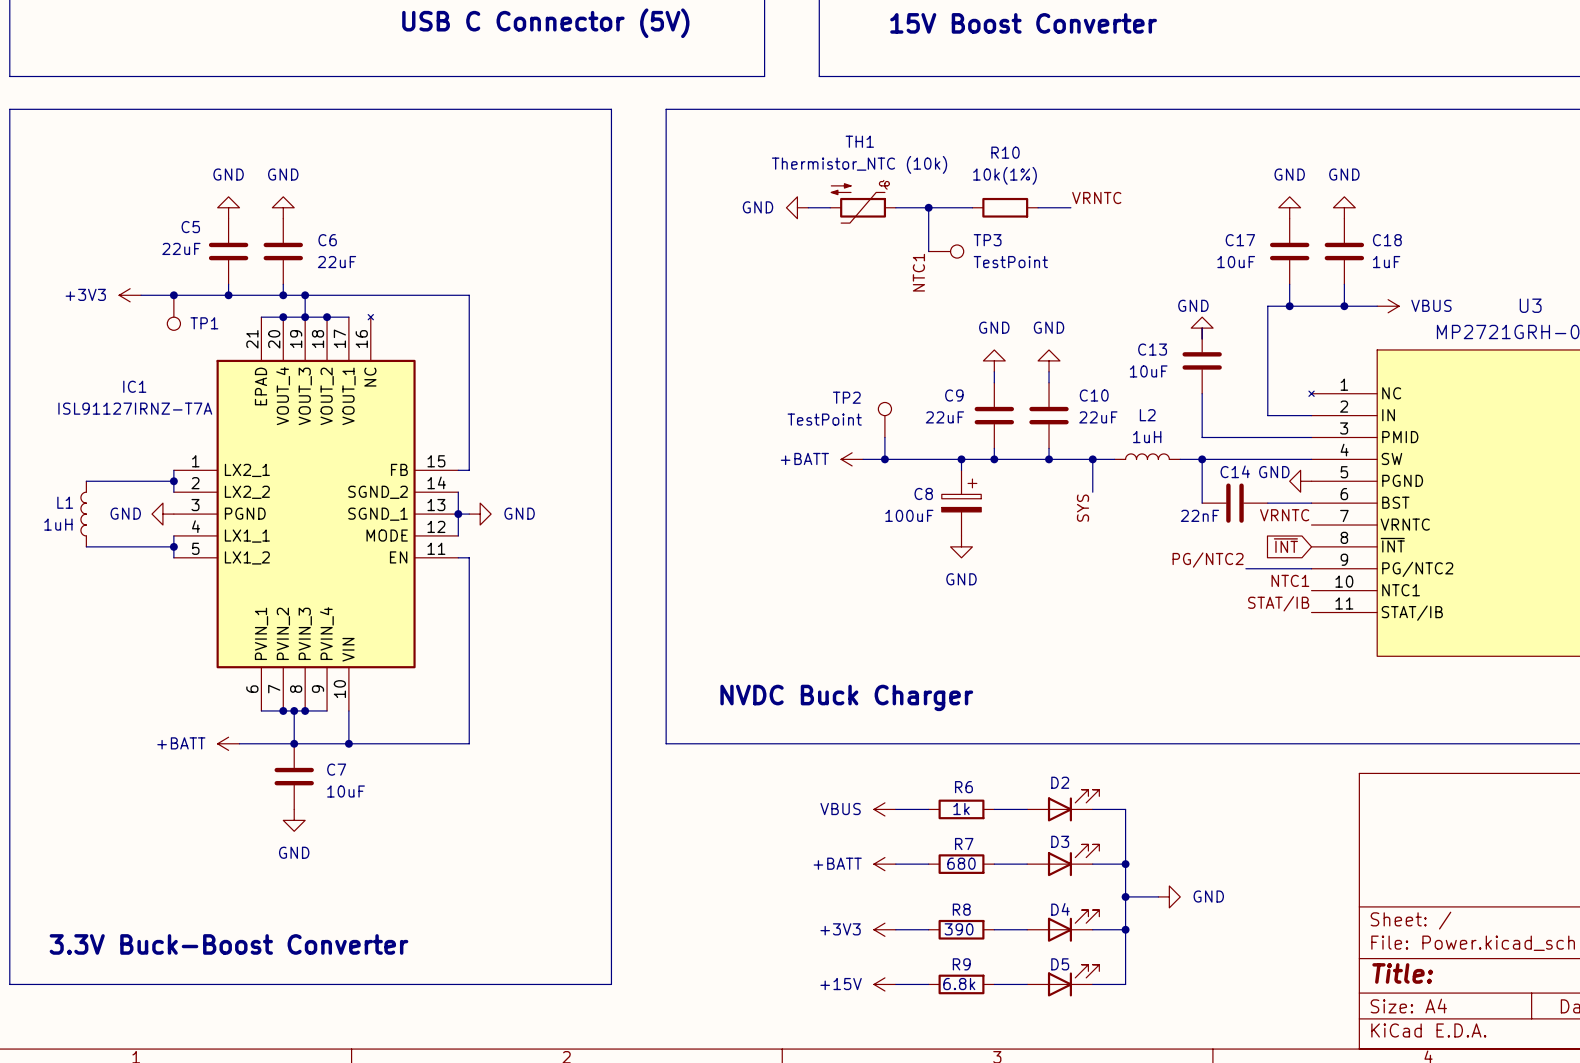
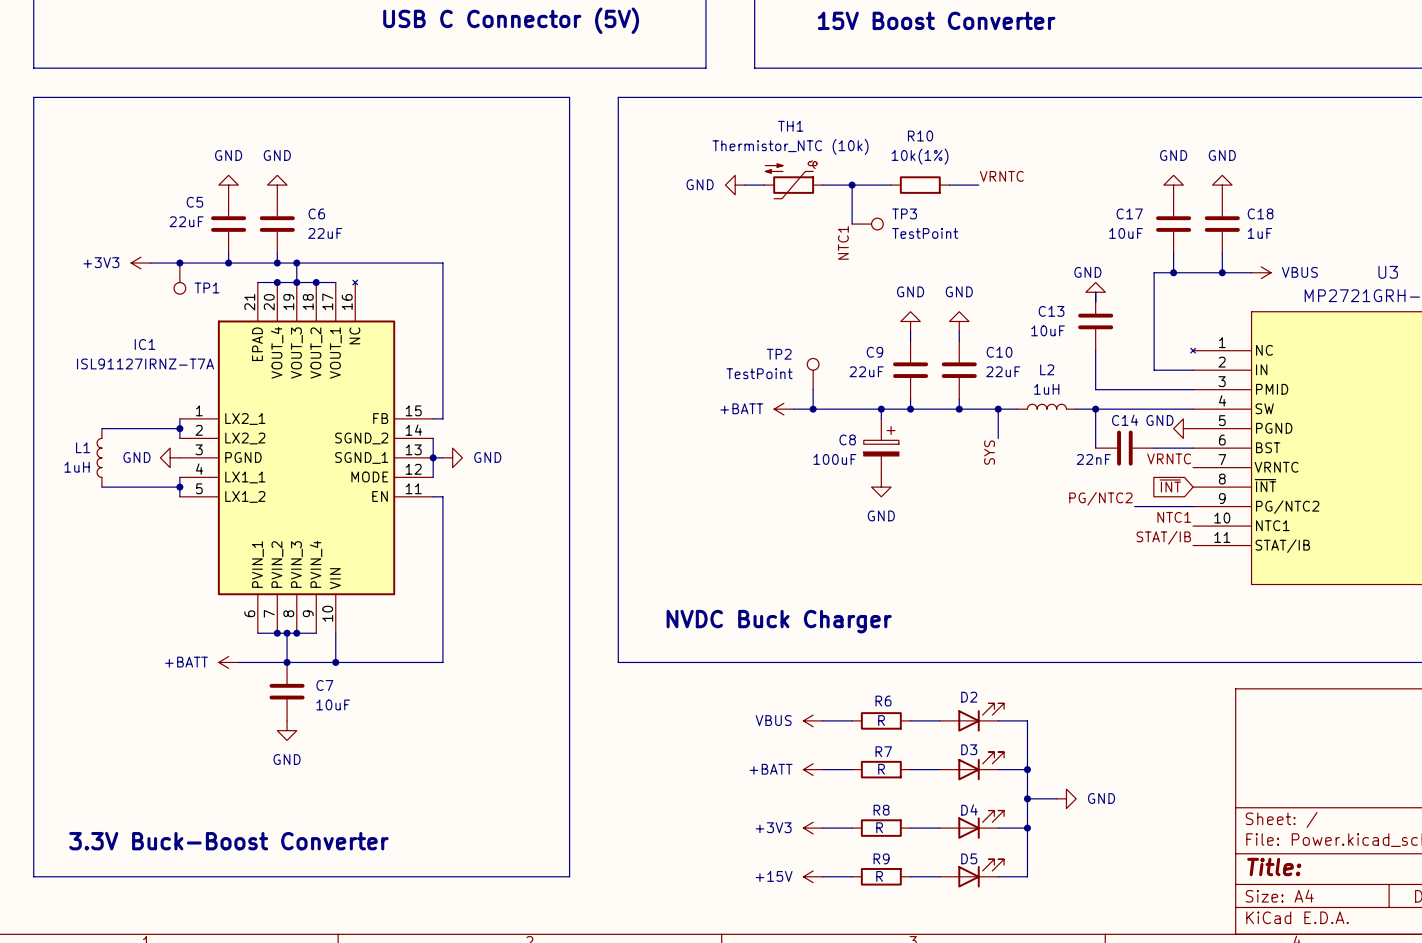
R6 value: 1k (961, 809) -> R (881, 720)
R7 value: 680 (961, 863) -> R (881, 769)
R8 value: 390 (959, 929) -> R (879, 827)
R9 value: 6.8k (959, 984) -> R (879, 876)

